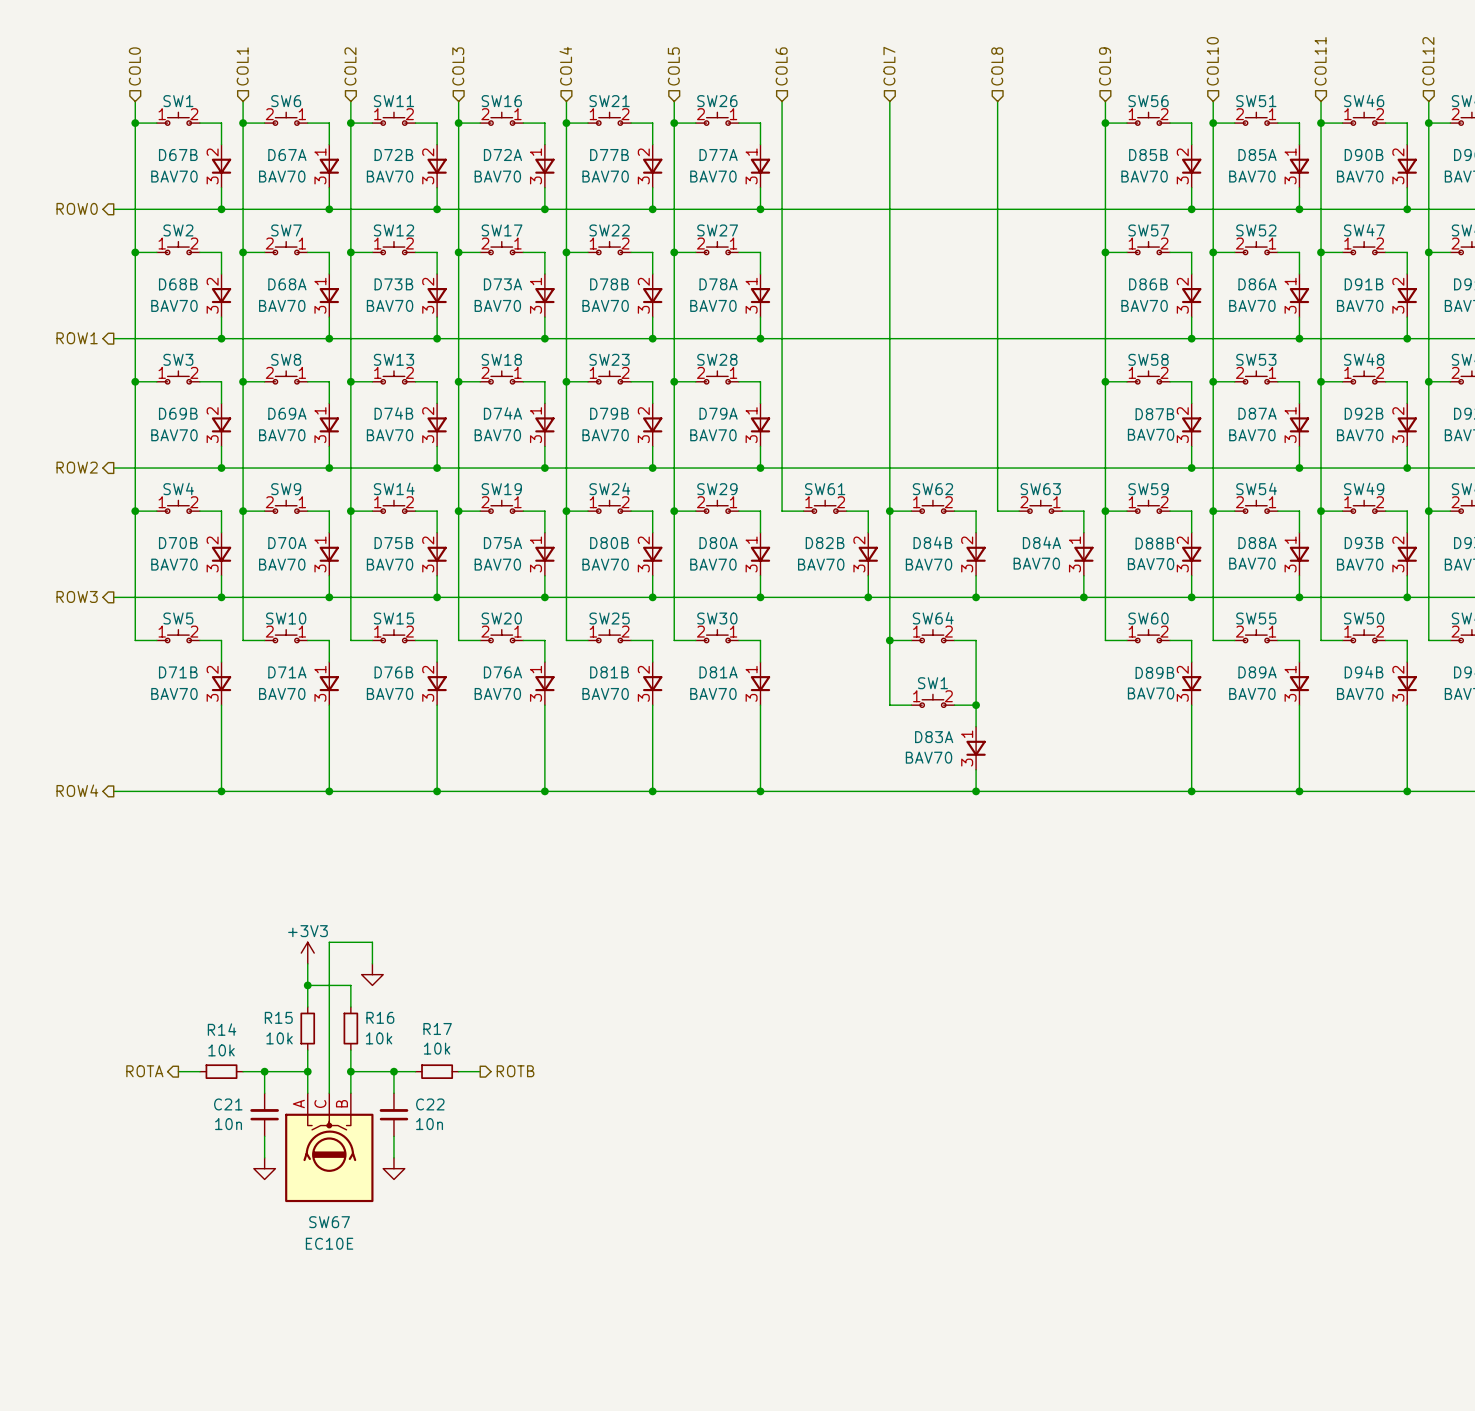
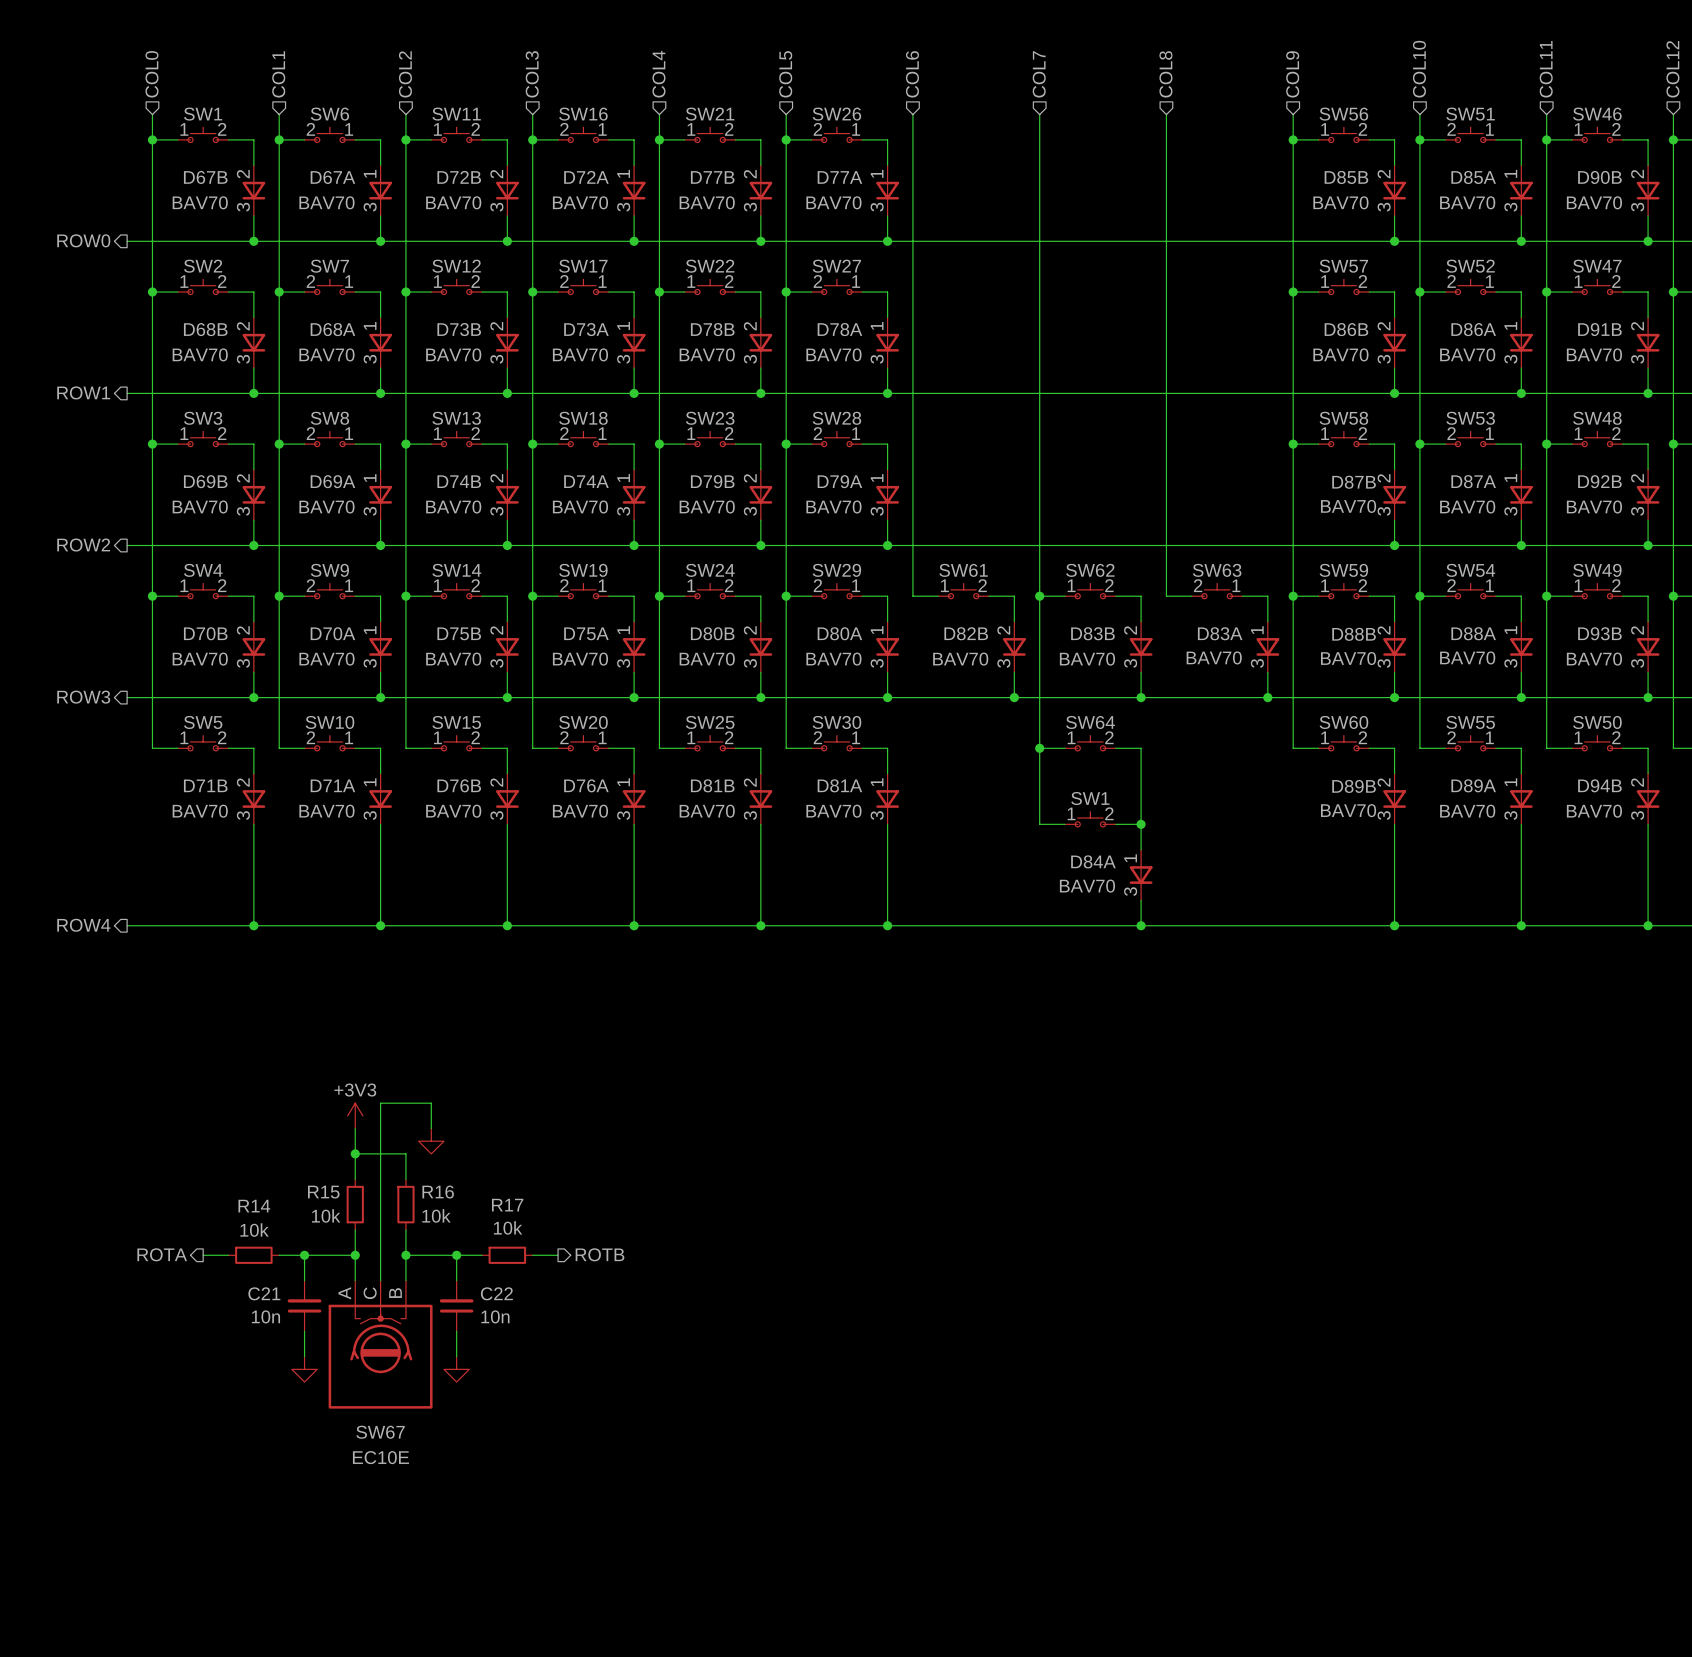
D84B name: D84B (932, 542) -> D83B (1092, 633)
D84A name: D84A (1041, 542) -> D83A (1220, 633)
D83A name: D83A (934, 737) -> D84A (1093, 861)

